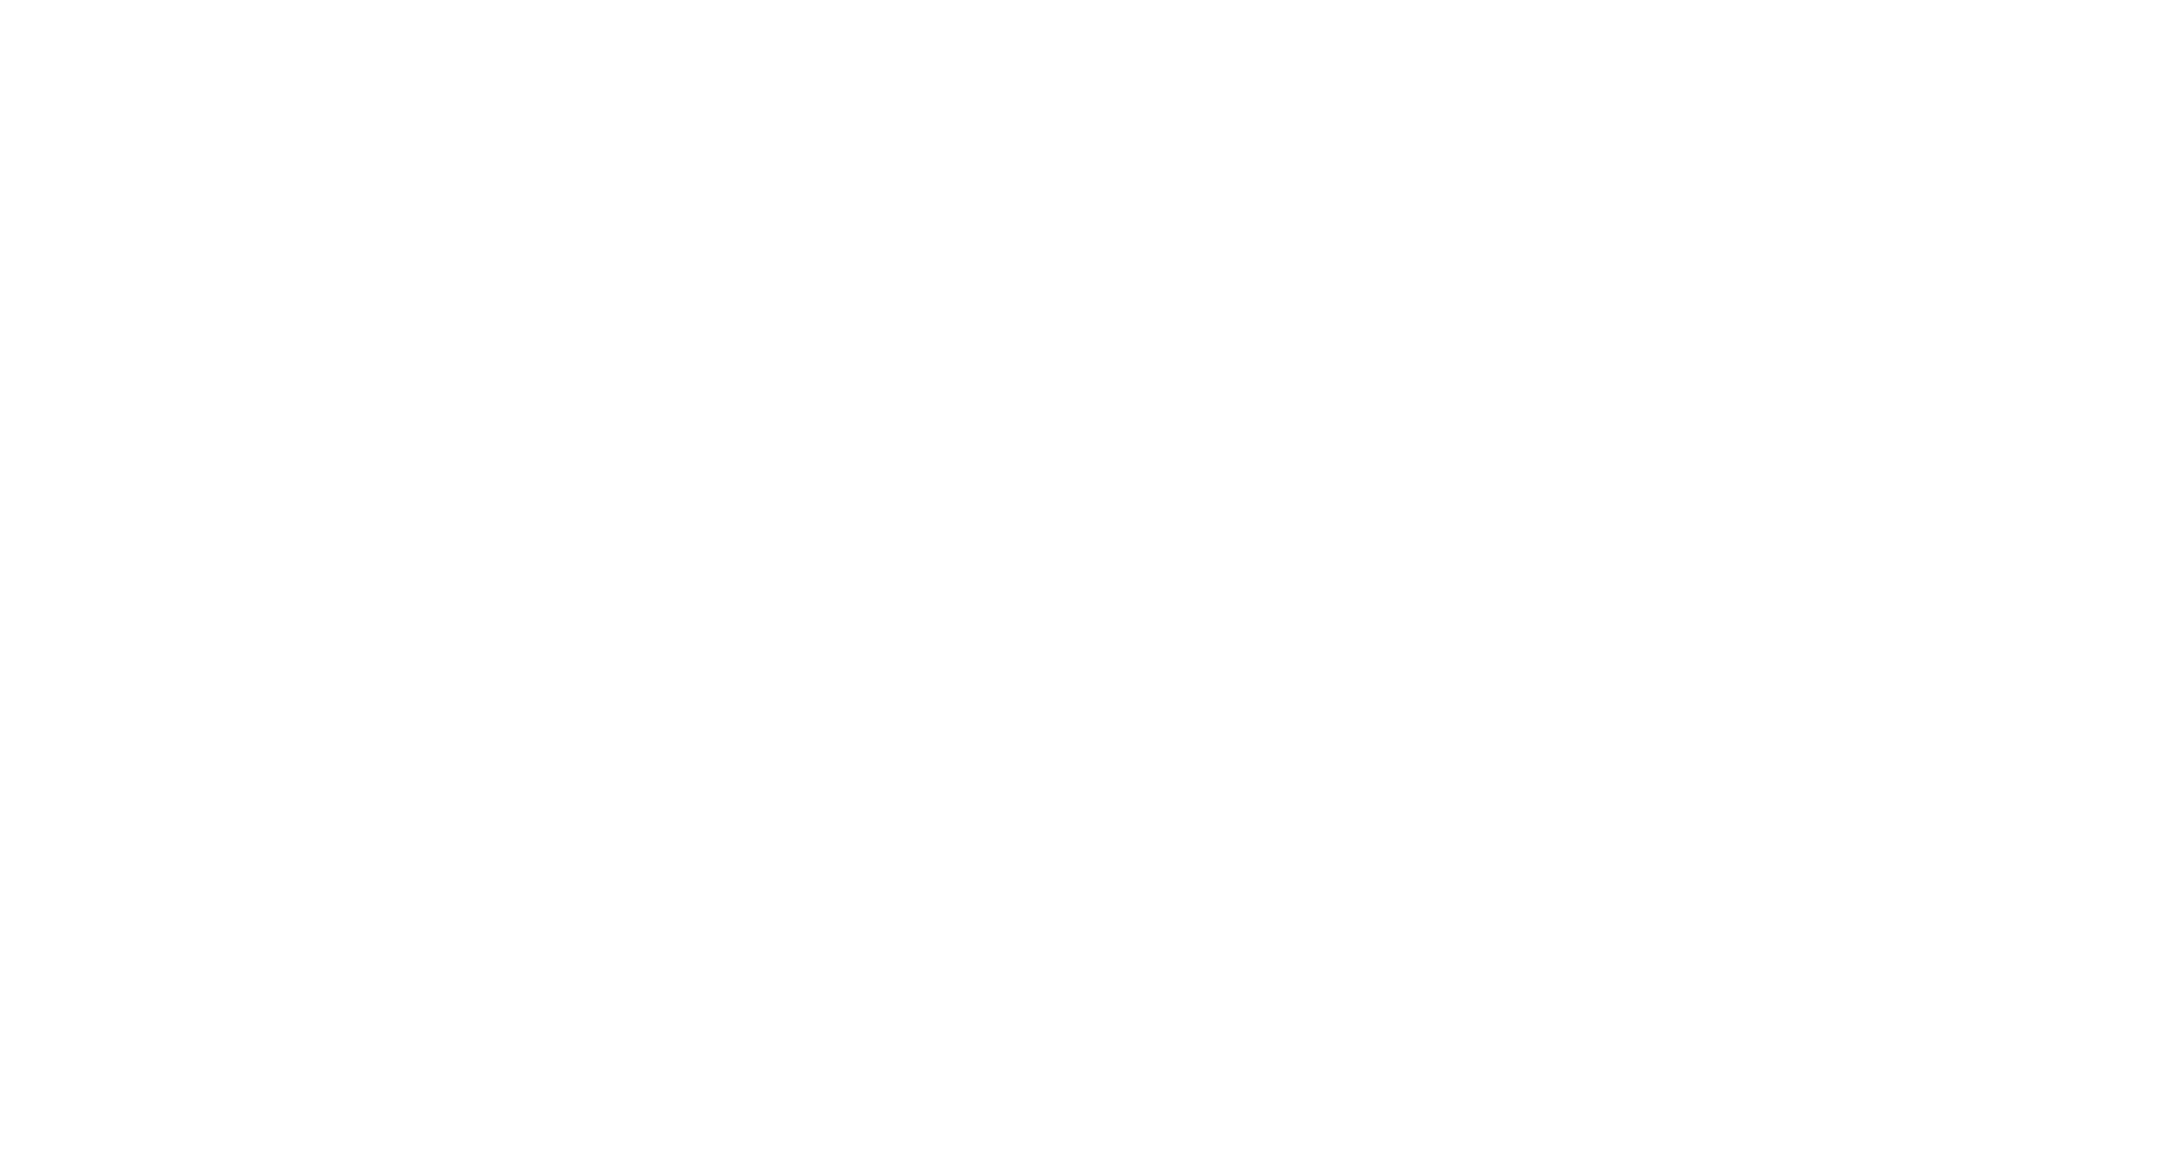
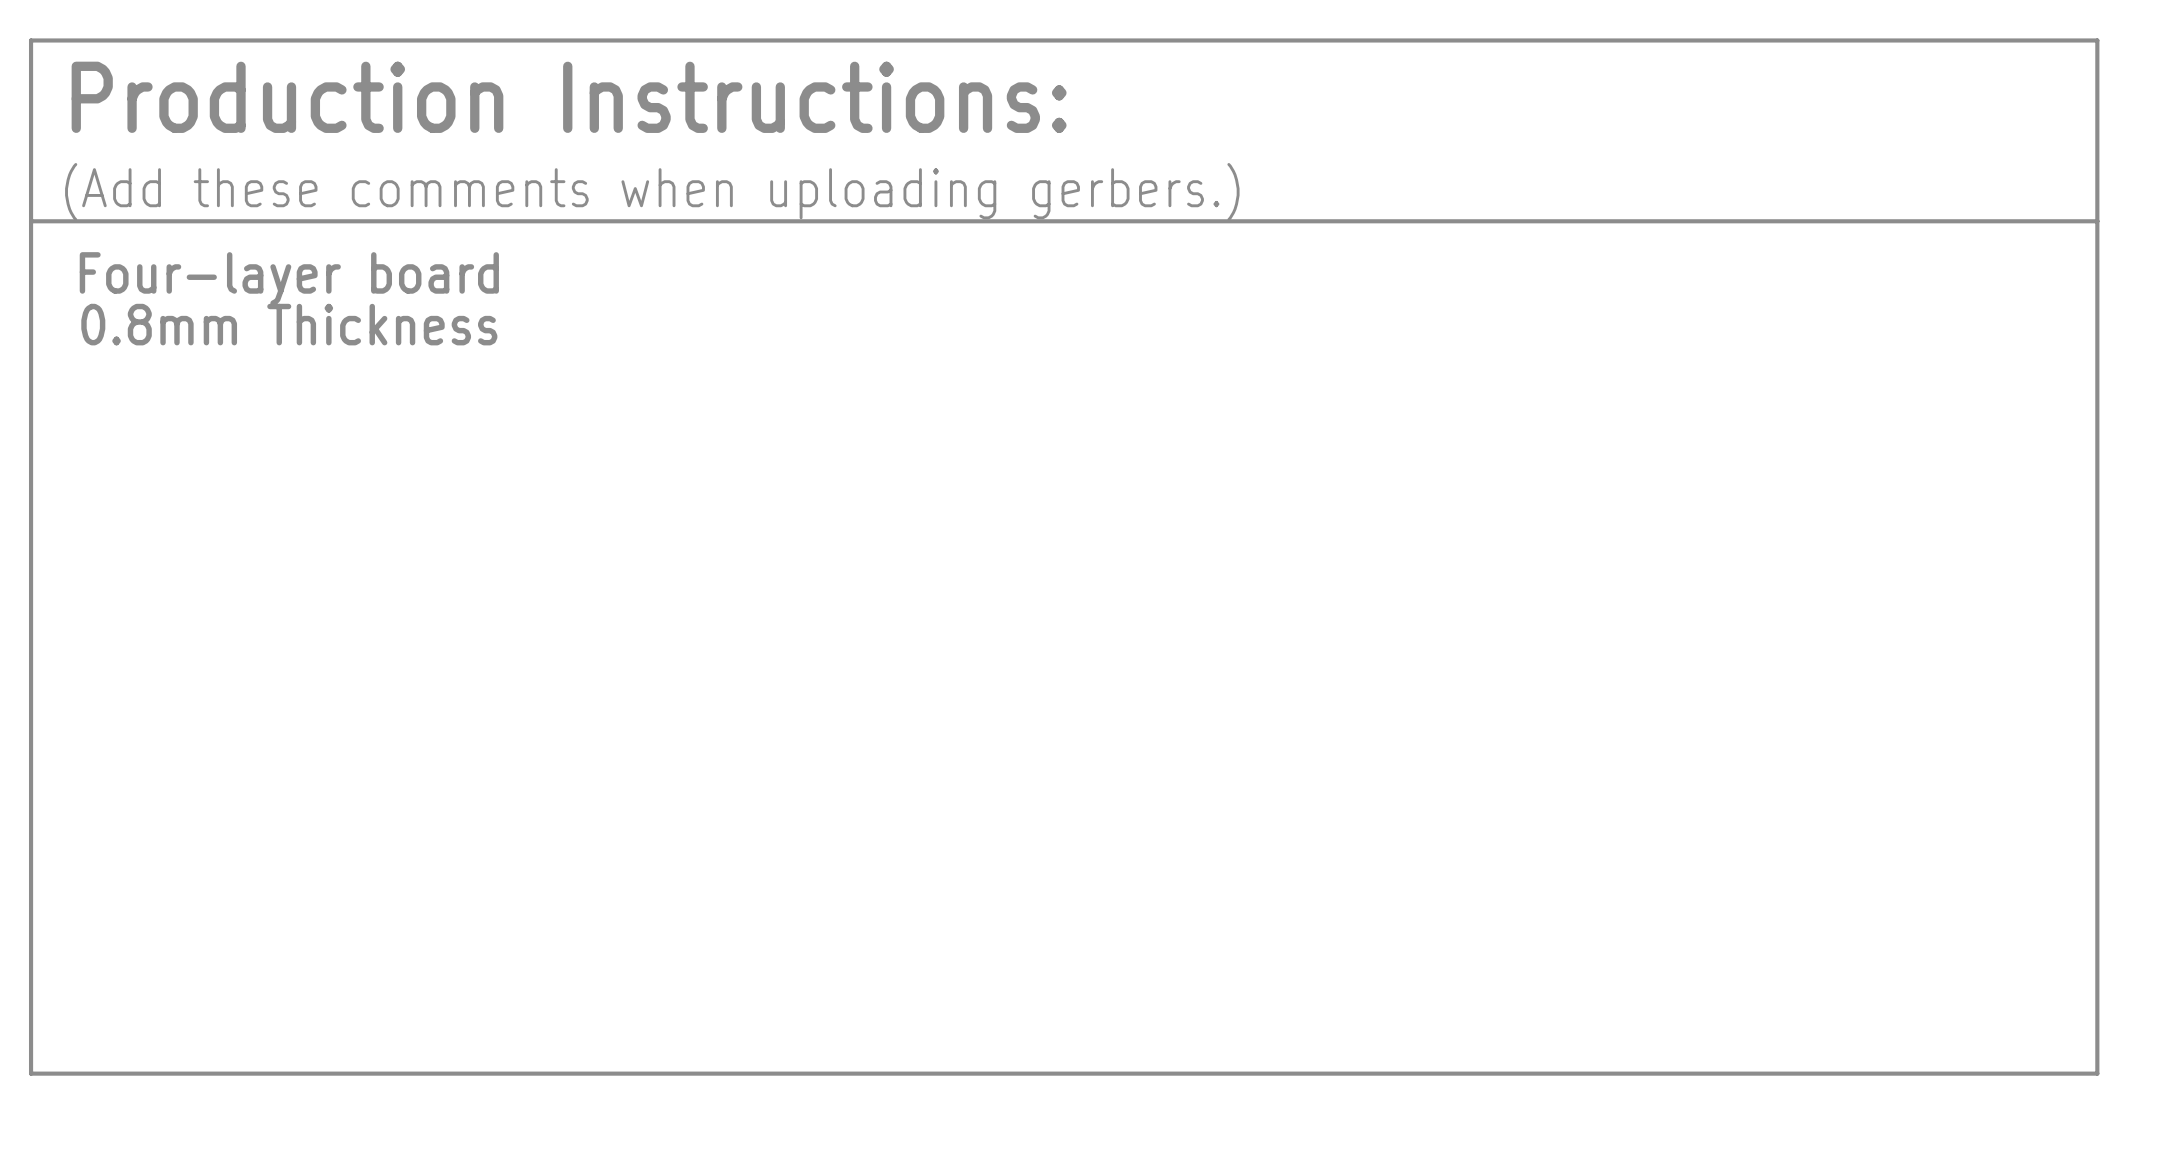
drawing: none -> [28, 38, 2100, 1076]
text: none -> Four-layer board (289, 278)
text: none -> 0.8mm Thickness (289, 324)

